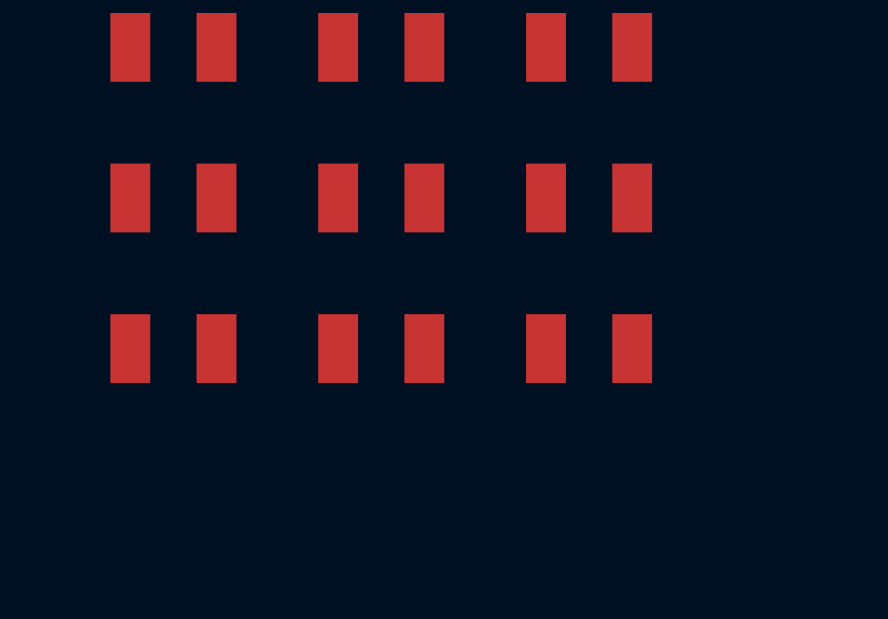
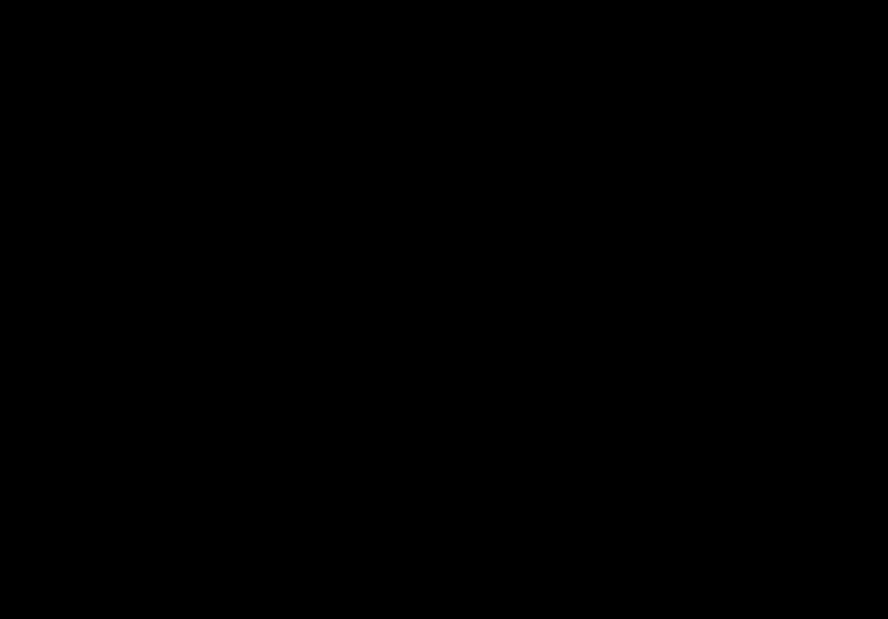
part: (173, 47) -> none
part: (381, 47) -> none
part: (589, 47) -> none
part: (173, 197) -> none
part: (381, 197) -> none
part: (589, 197) -> none
part: (173, 348) -> none
part: (381, 348) -> none
part: (589, 348) -> none

